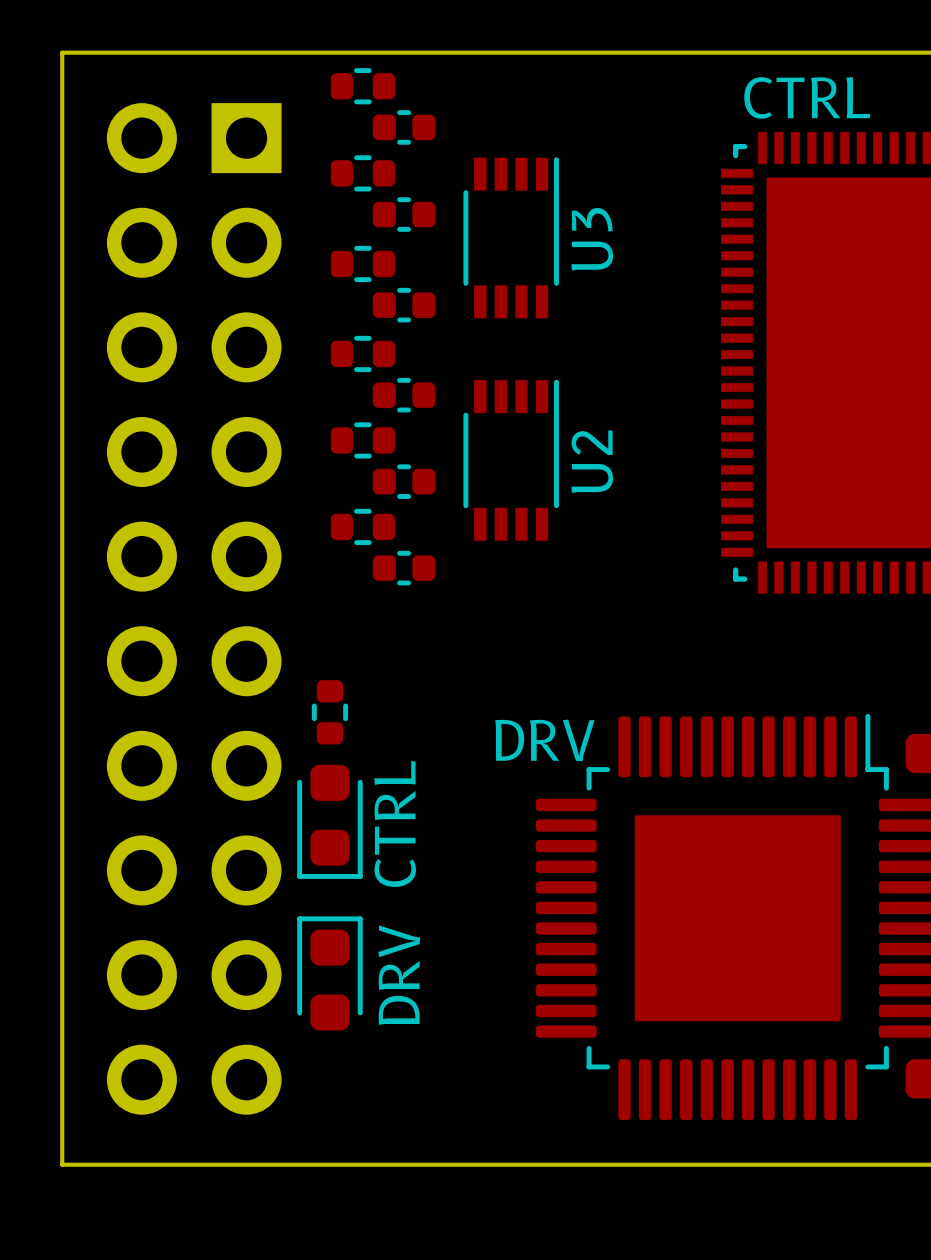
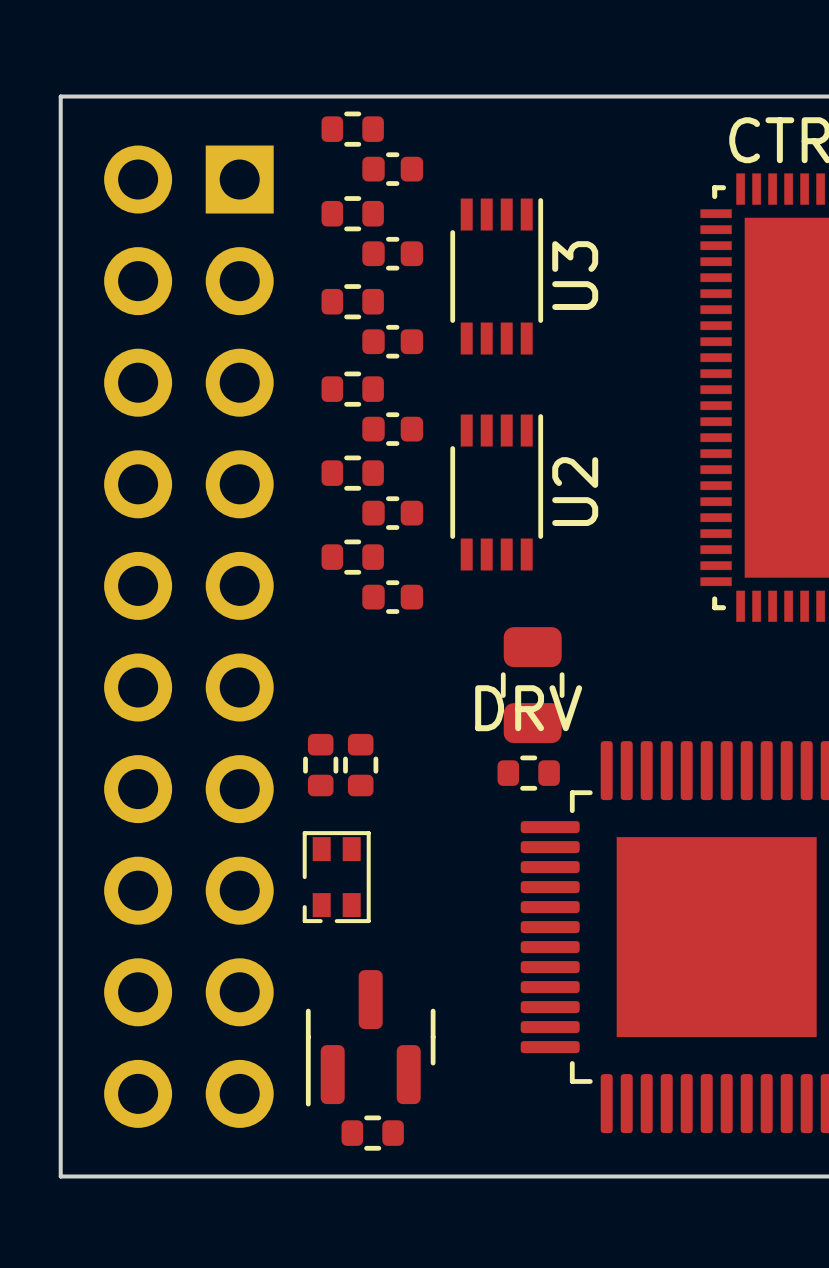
part: none -> (532, 685)
part: (329, 712) -> none
text position: DRV (544, 740) -> DRV (528, 708)
part: none -> (320, 765)
part: none -> (360, 765)
part: none -> (528, 773)
part footprint: [297, 764, 363, 879] -> [302, 831, 371, 924]
text: CTRL (395, 823) -> none
part: (329, 973) -> none
text: DRV (399, 975) -> none
part: none -> (370, 1038)
part: none -> (372, 1133)

